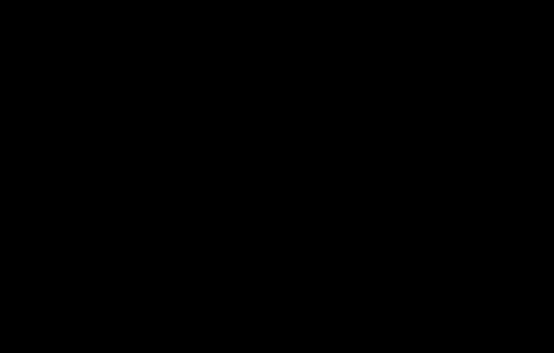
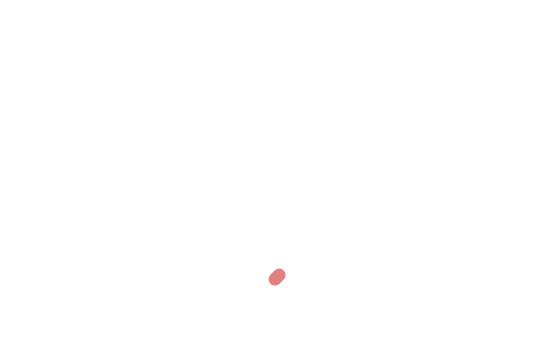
top track: none -> (279, 275) (275, 279)

